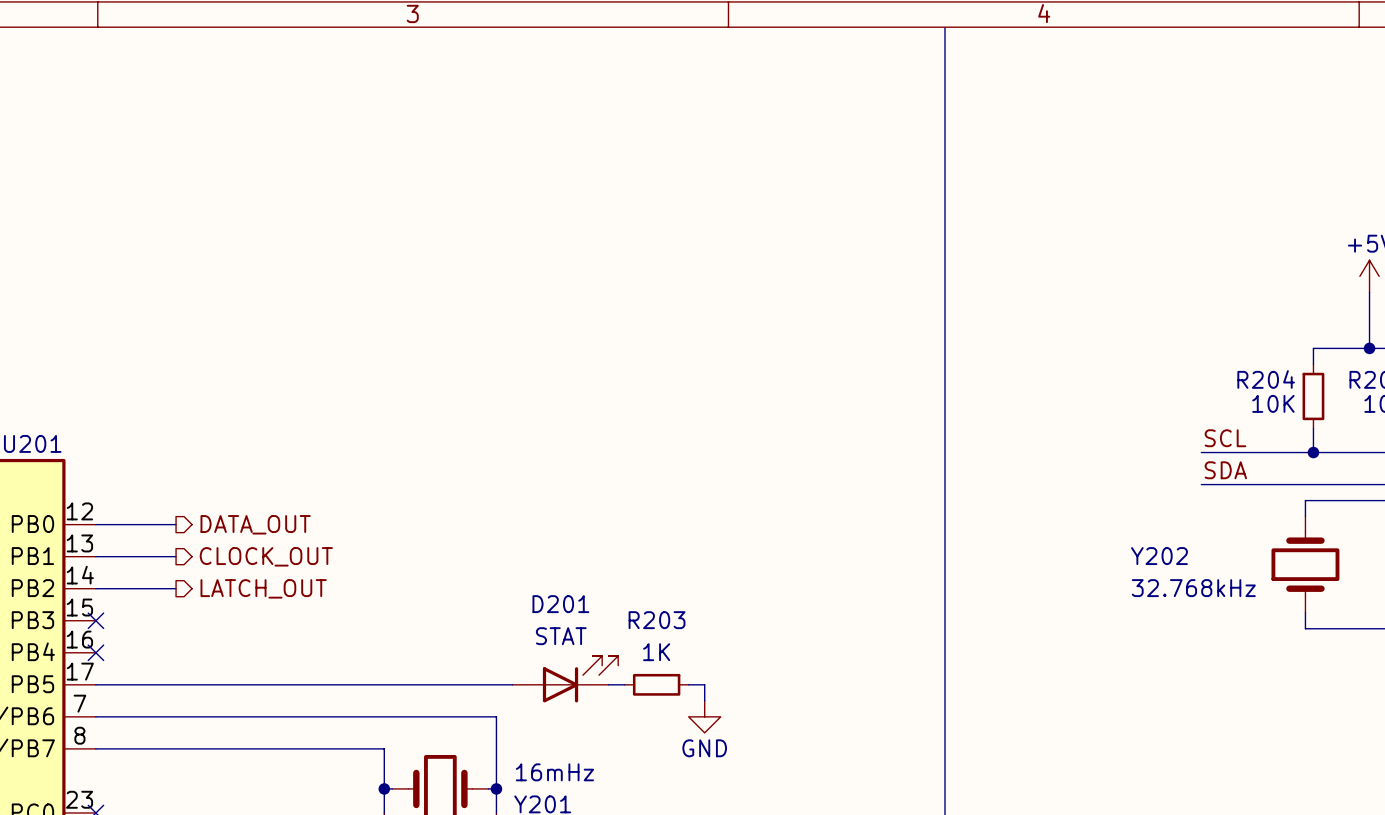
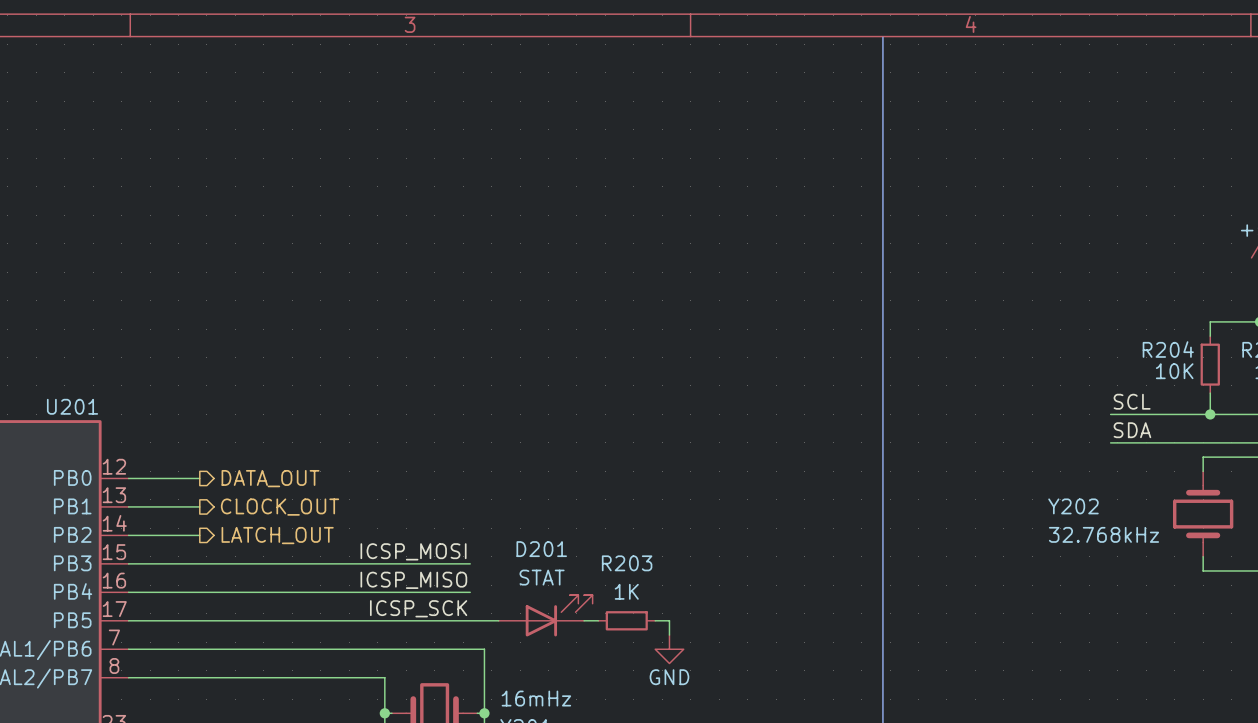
label: none -> ICSP_MOSI (413, 551)
wire: none -> (128, 563) (470, 563)
no-connect mark: (95, 620) -> none
label: none -> ICSP_MISO (413, 580)
wire: none -> (128, 592) (470, 592)
no-connect mark: (95, 652) -> none
label: none -> ICSP_SCK (418, 608)

